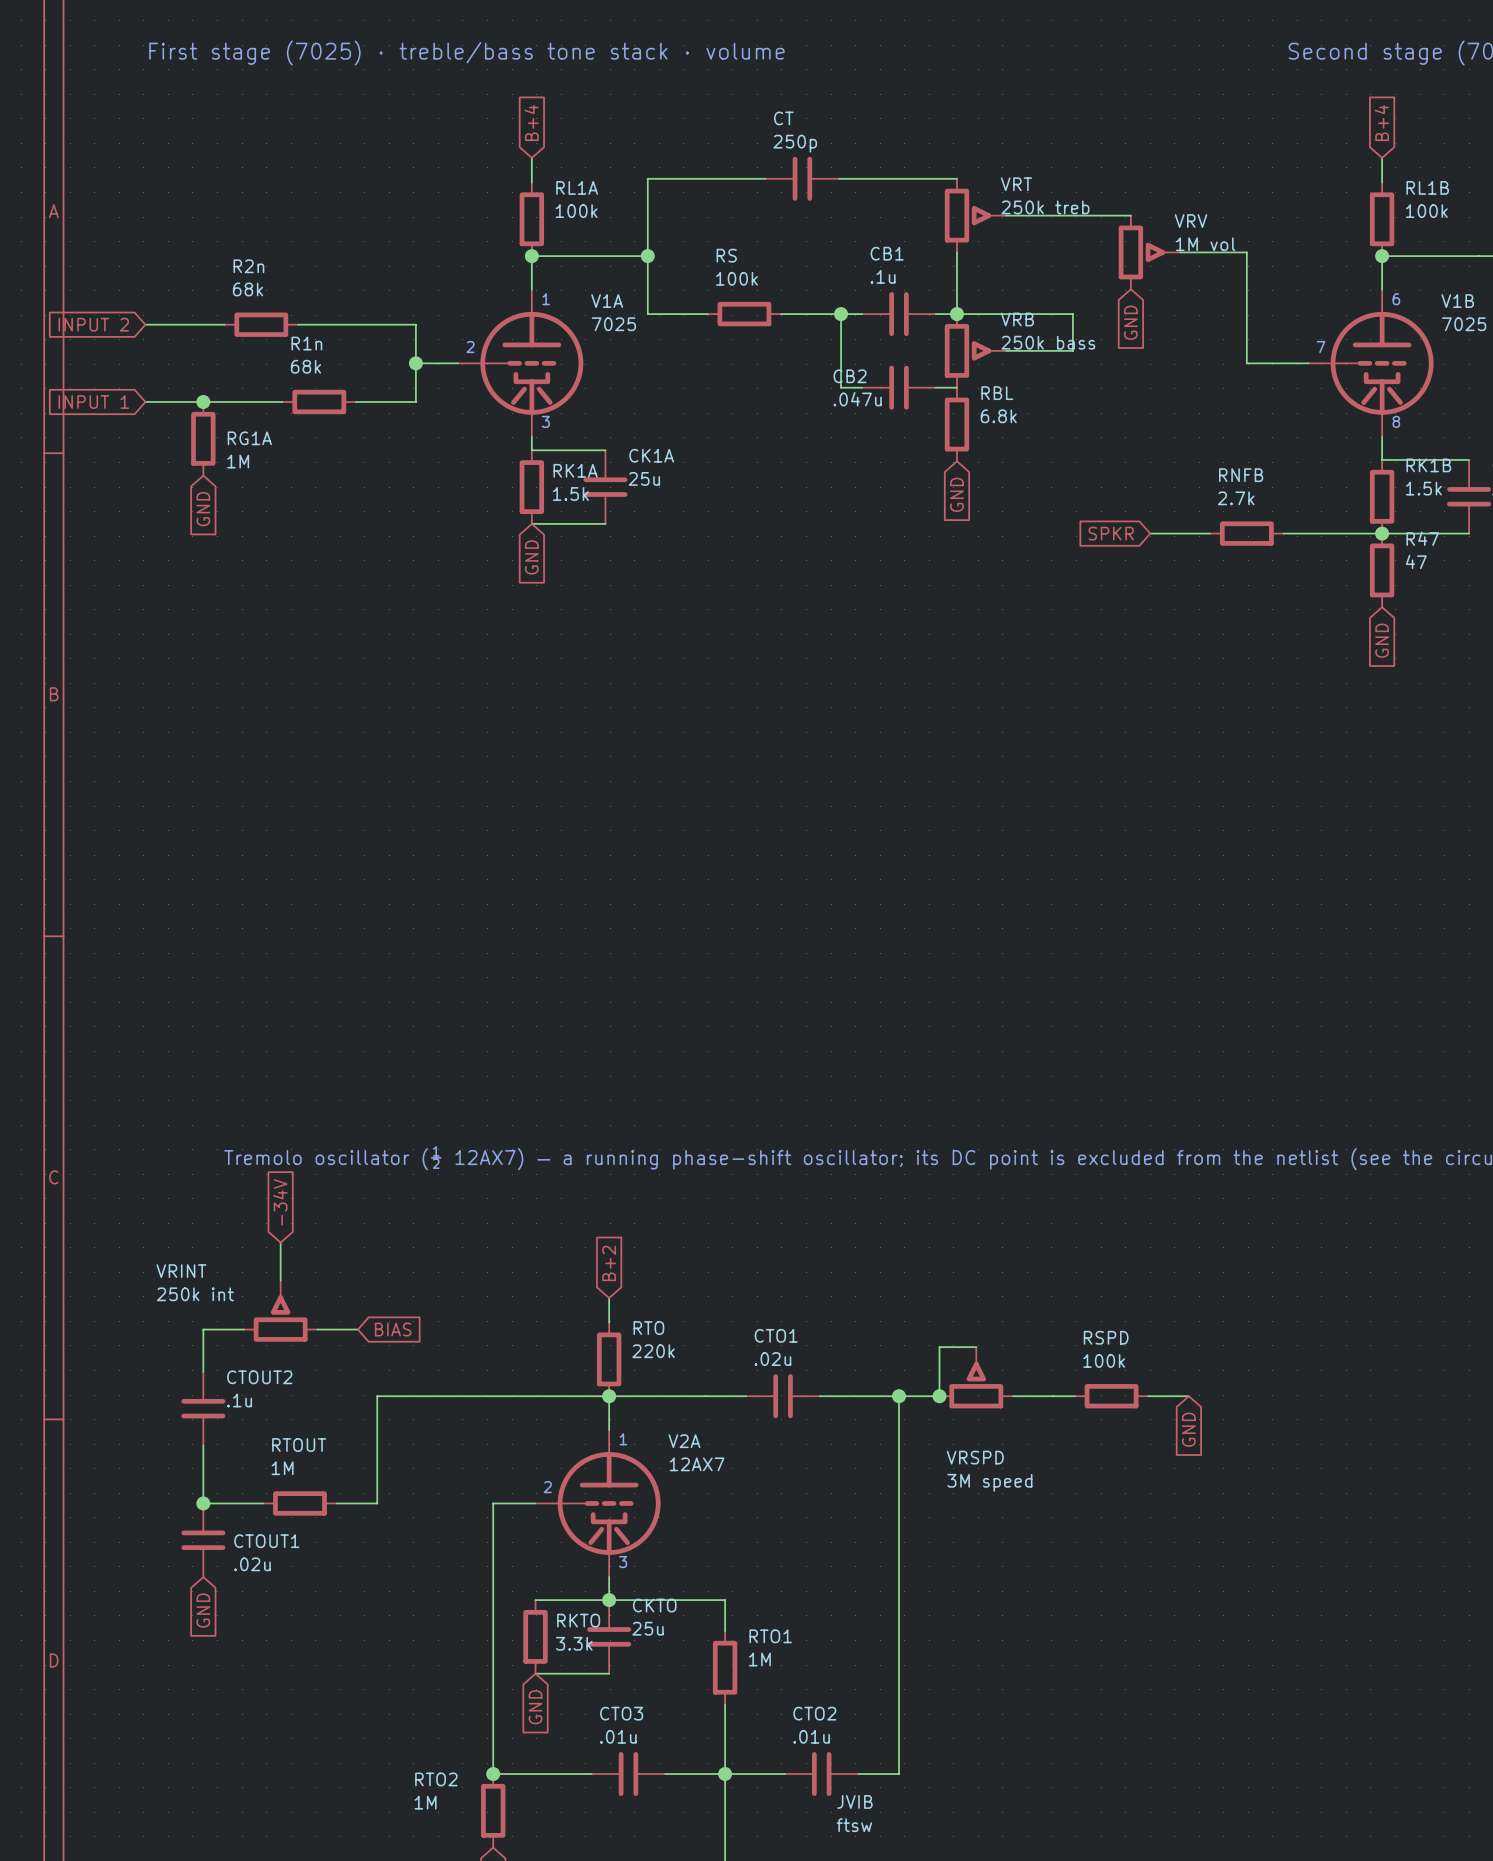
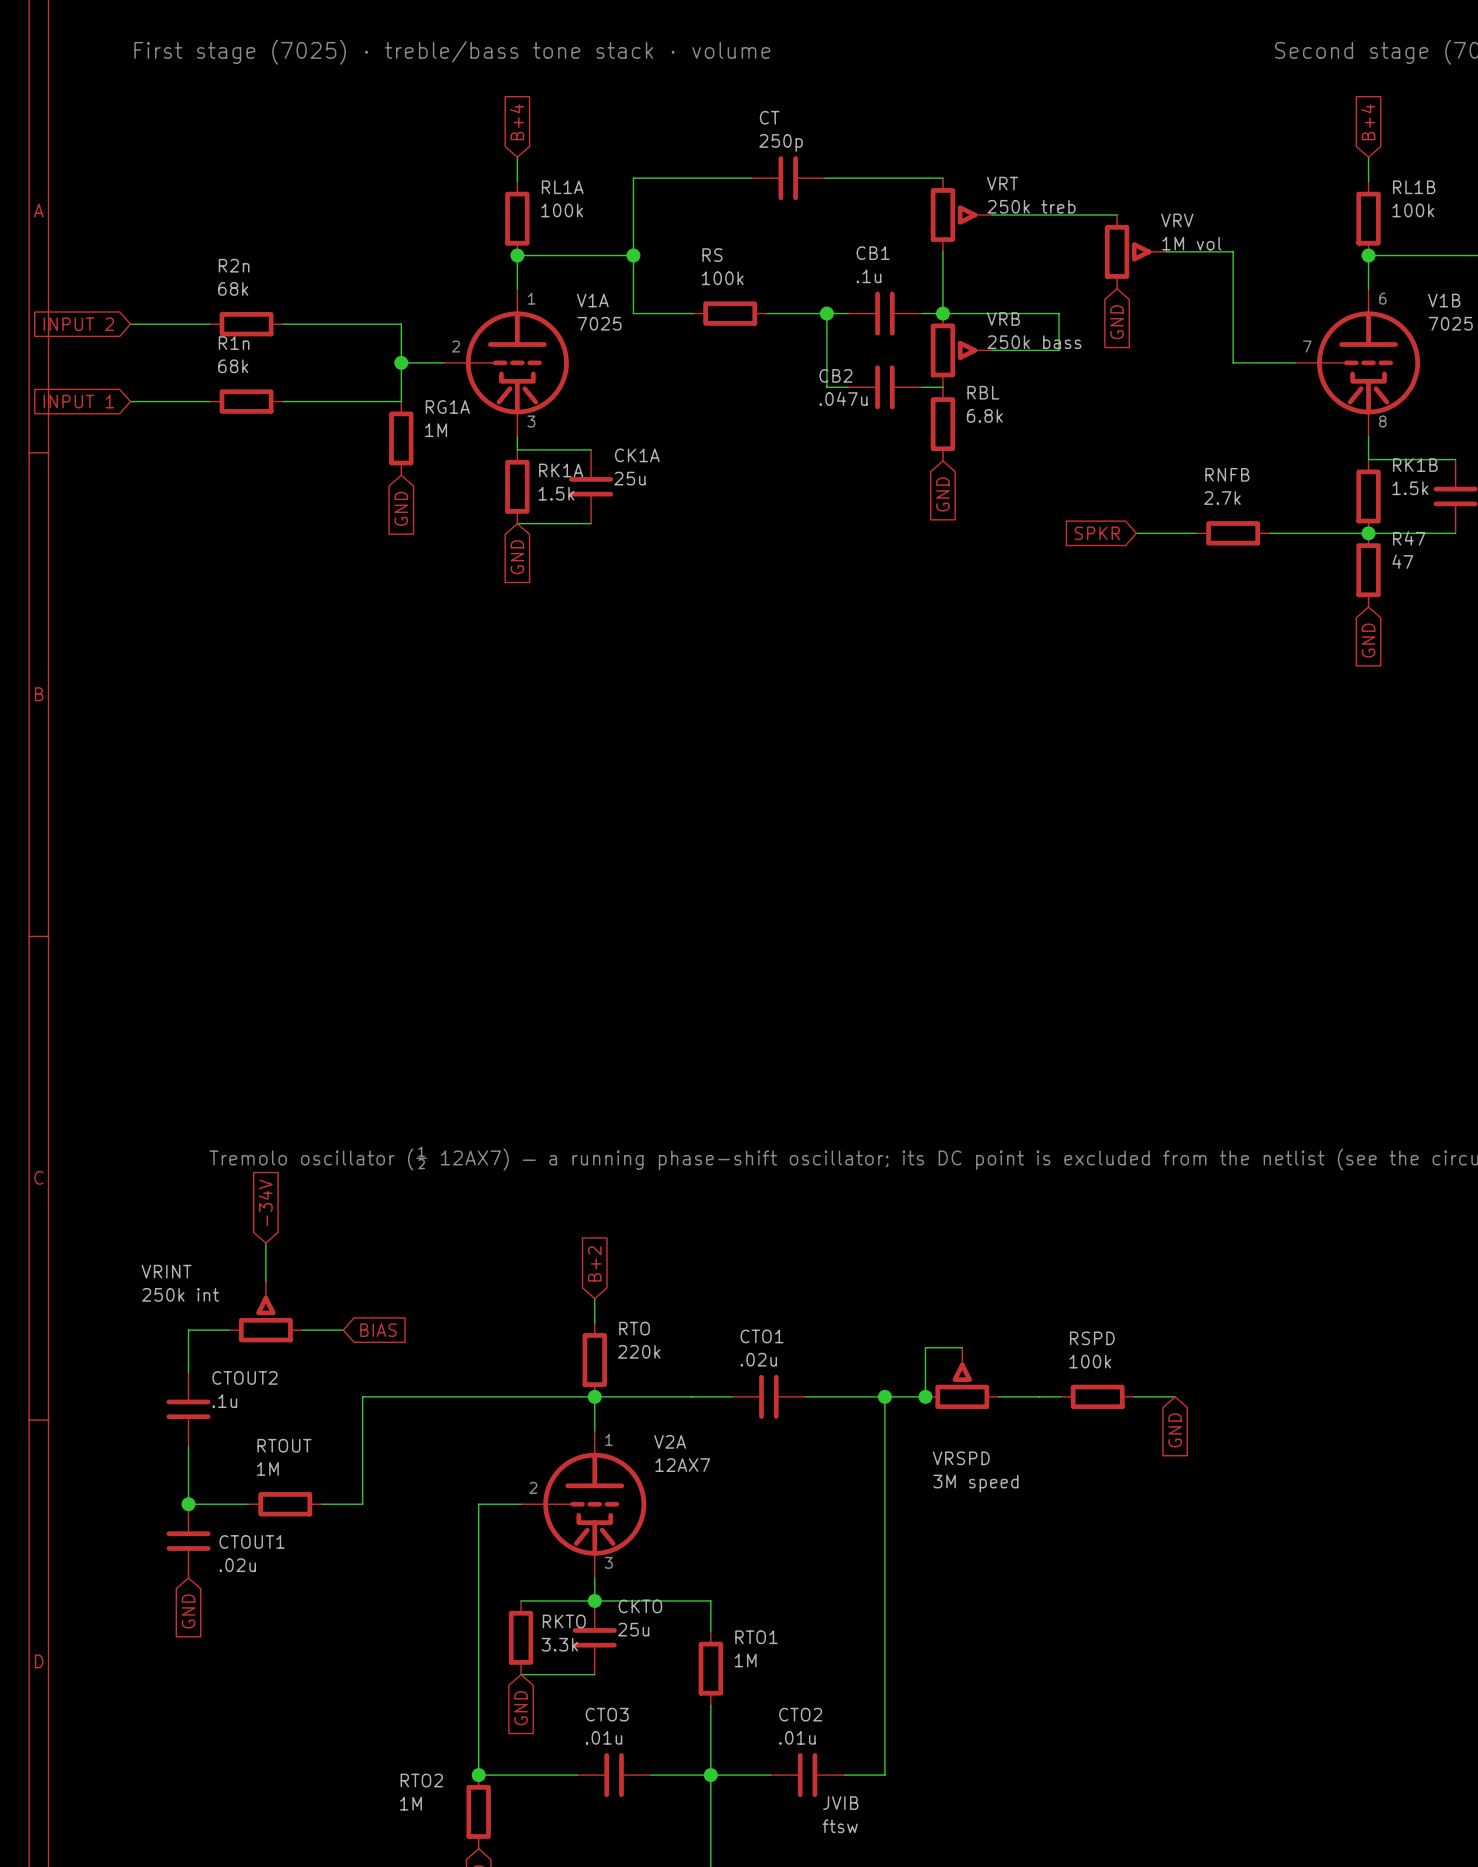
junction: (203, 402) -> none
wire: (224, 402) (282, 402) -> (283, 401) (341, 401)
R1n position: (319, 402) -> (246, 401)
RG1A position: (203, 438) -> (401, 438)
RG1A name position: RG1A (249, 438) -> RG1A (447, 407)
RG1A value position: 1M (238, 461) -> 1M (436, 430)
global label position: GND (203, 509) -> GND (401, 508)

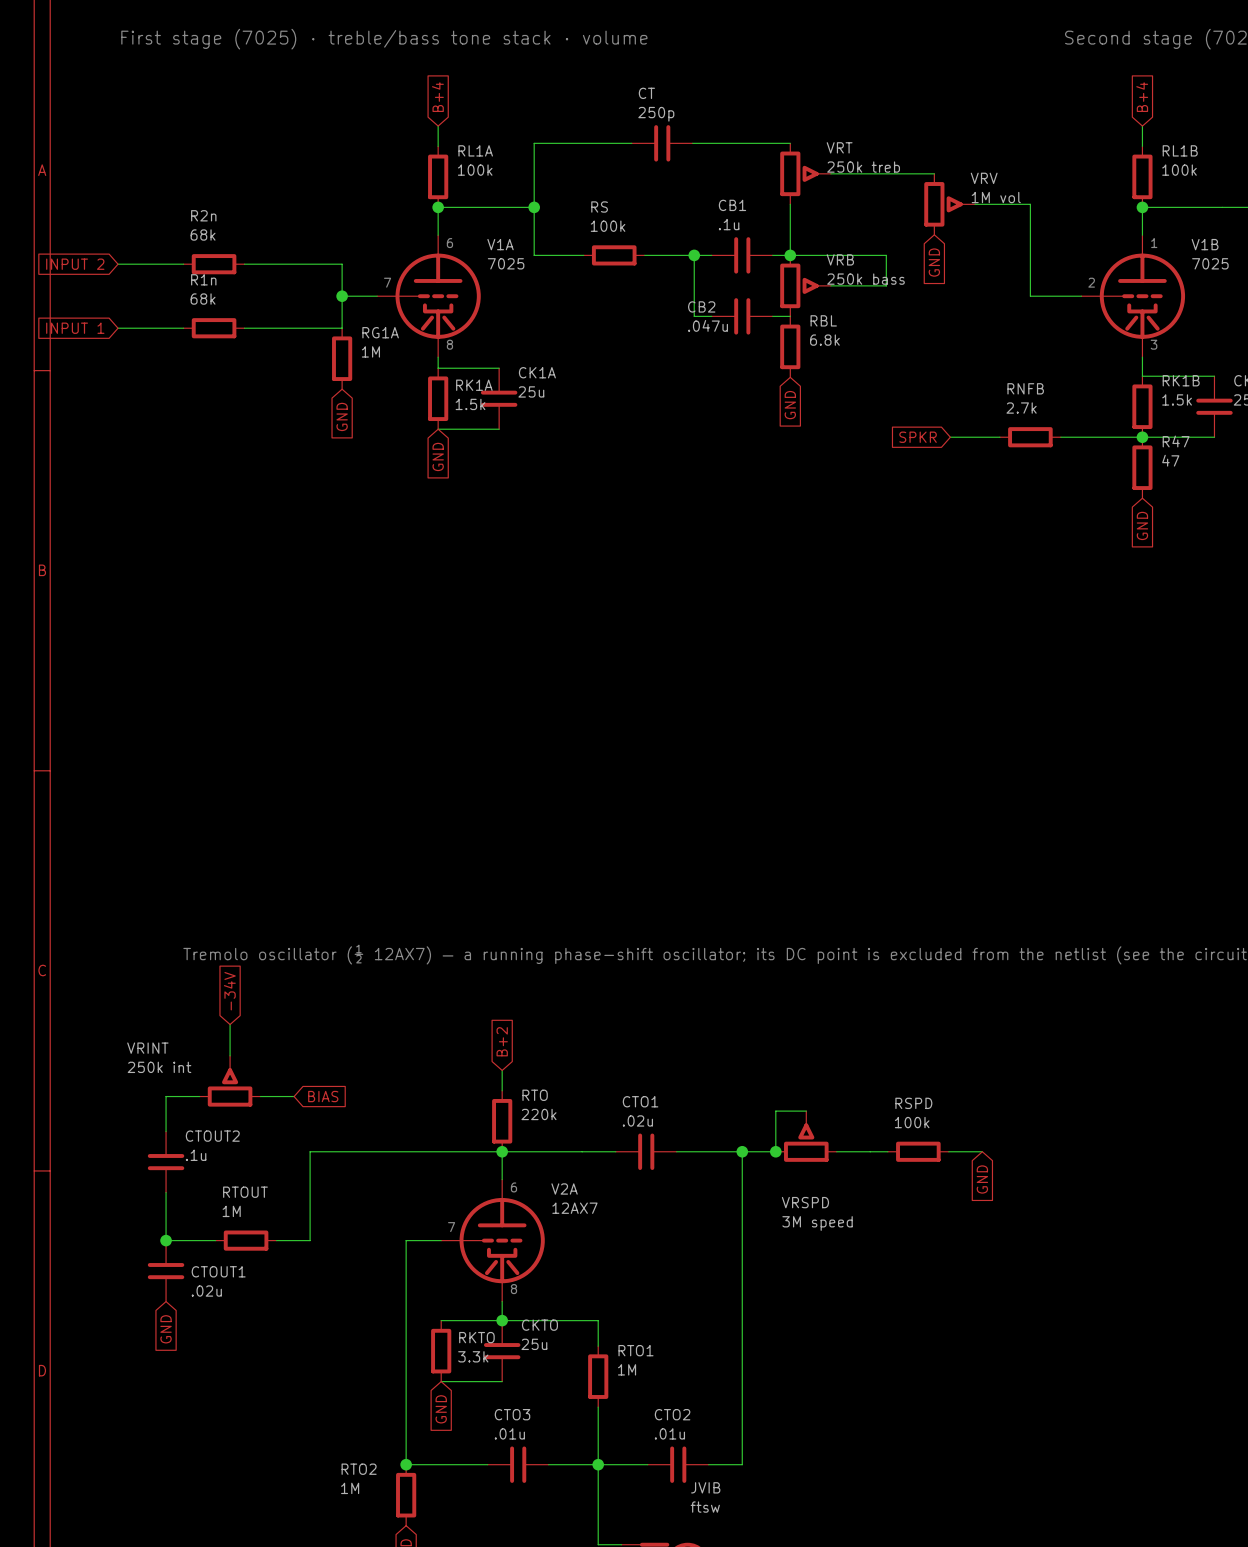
text: 1 (531, 298) -> 6 (449, 243)
text: 6 (1382, 298) -> 1 (1154, 243)
text: 2 (455, 346) -> 7 (387, 282)
text: 7 (1307, 346) -> 2 (1091, 282)
text: 3 (531, 421) -> 8 (449, 344)
text: 8 (1382, 421) -> 3 (1154, 344)
text: 1 (609, 1440) -> 6 (513, 1187)
text: 2 (533, 1487) -> 7 (451, 1227)
text: 3 (608, 1562) -> 8 (513, 1289)

